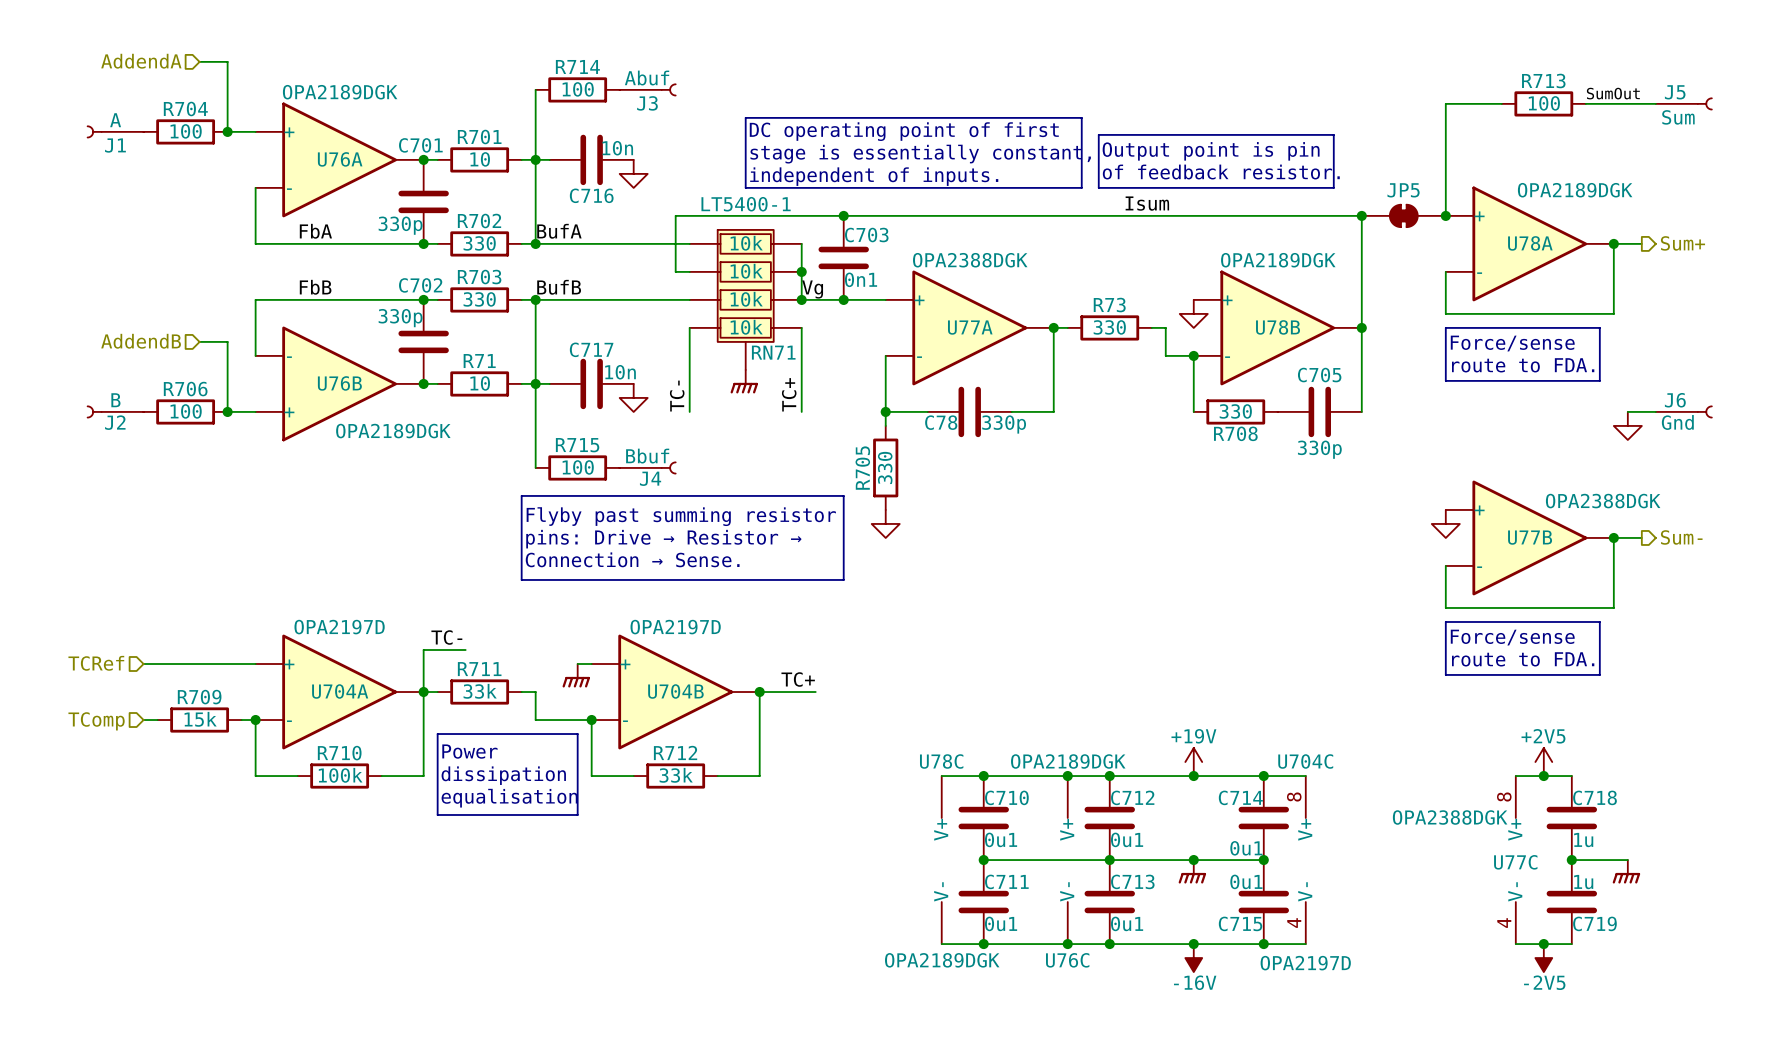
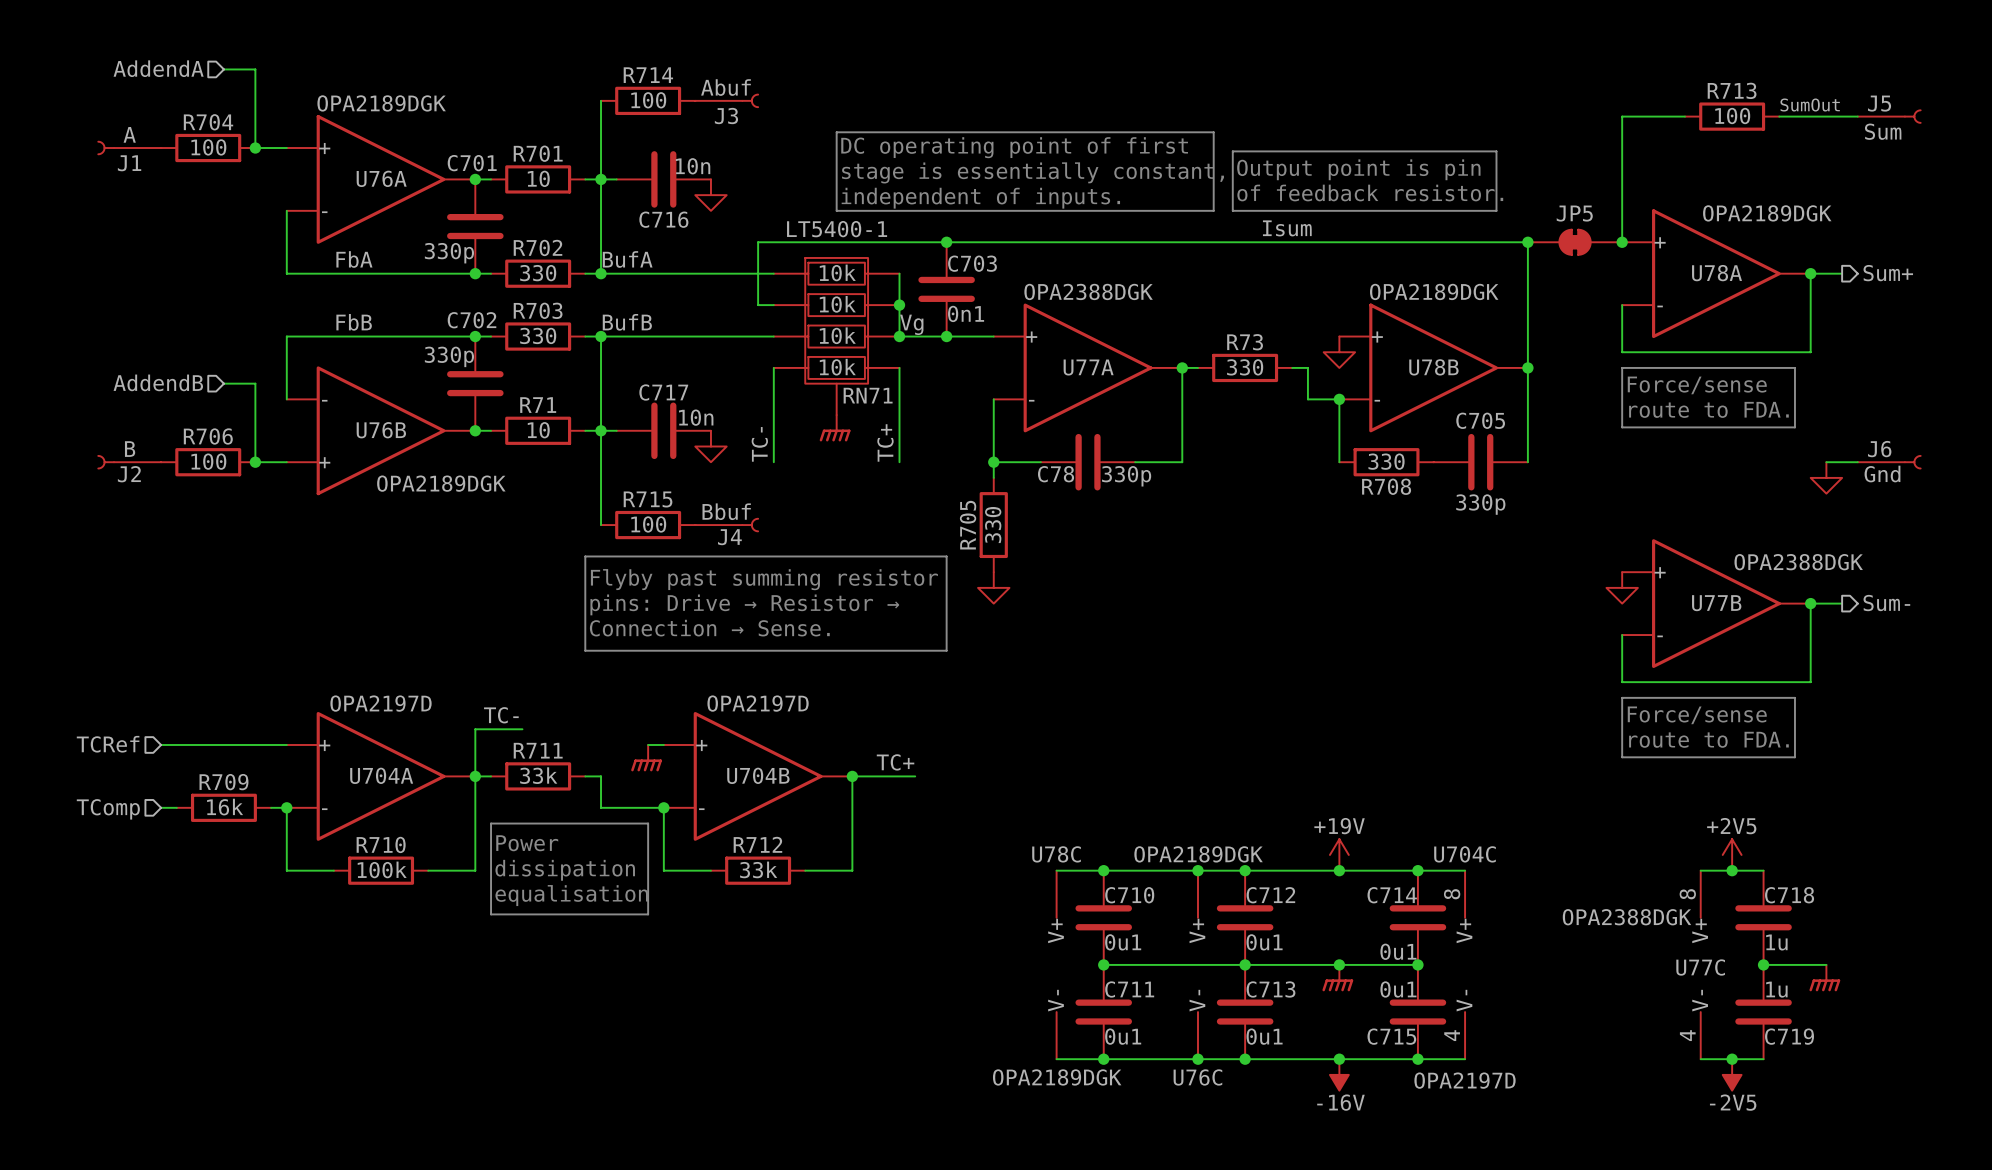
R709 value: 15k (200, 719) -> 16k (225, 807)

